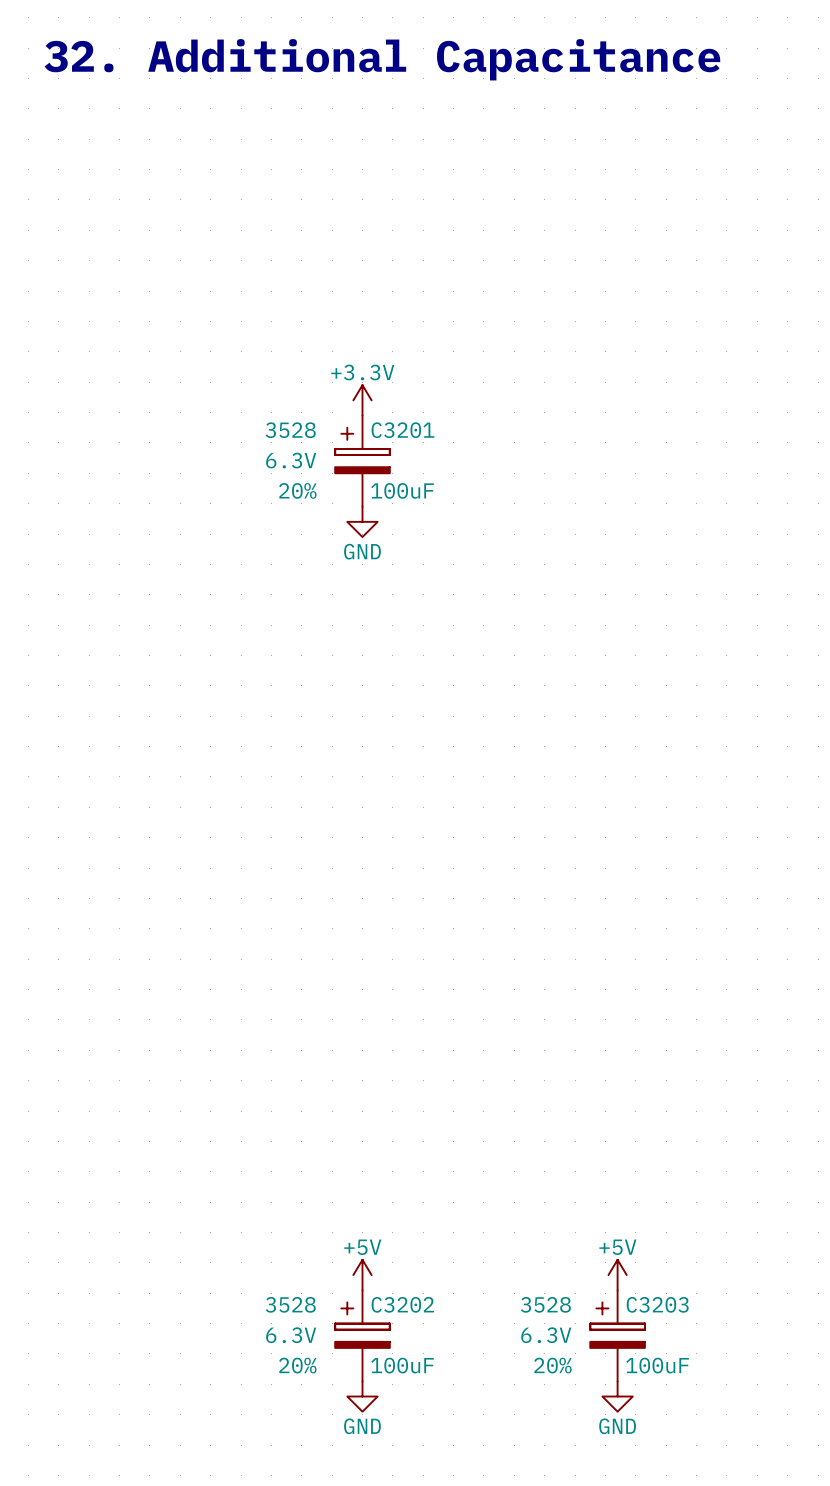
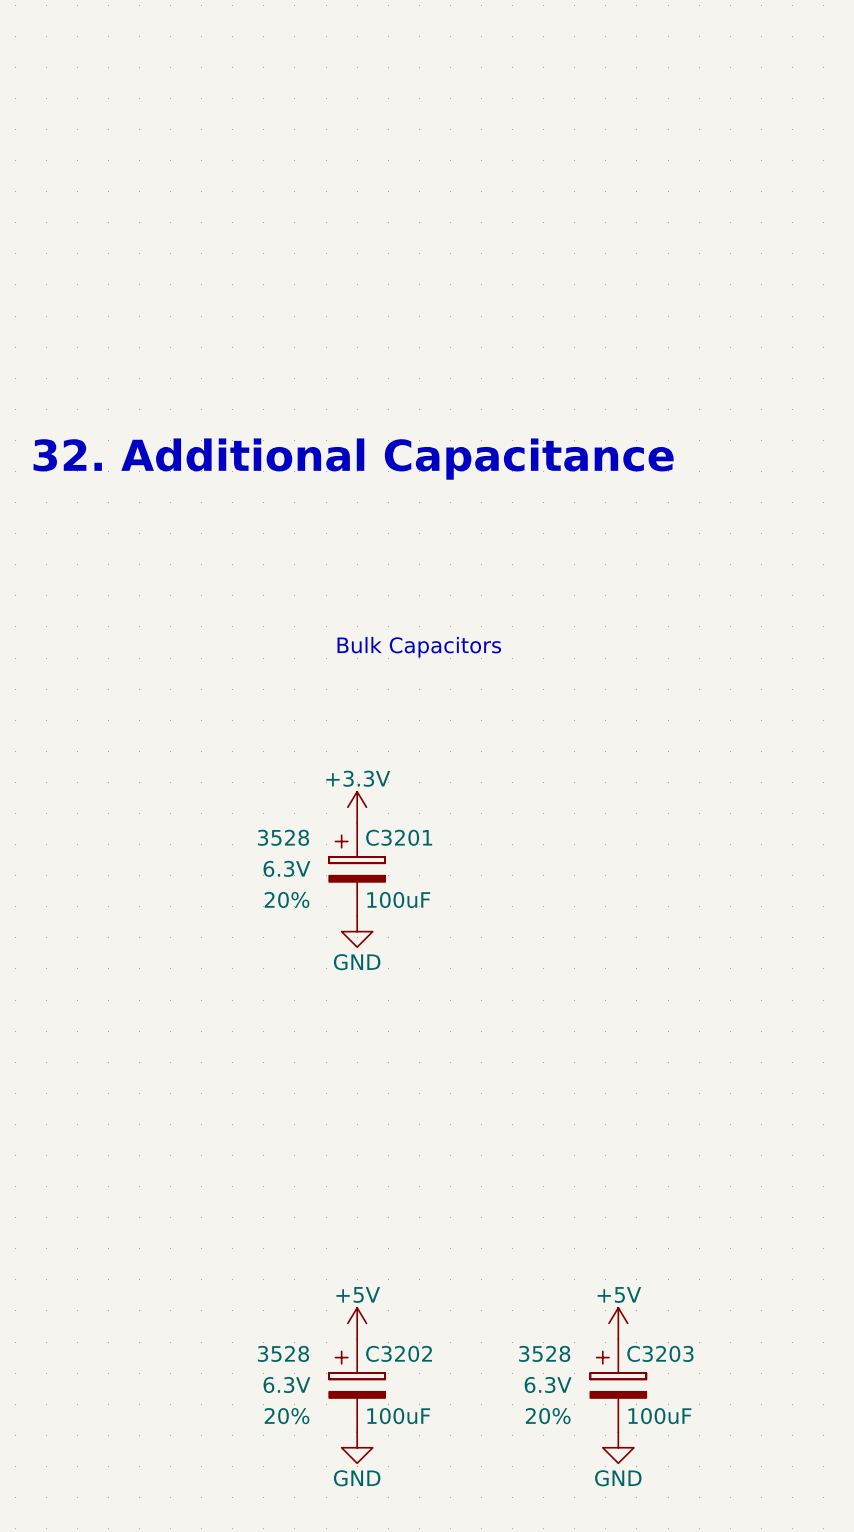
text: 32. Additional Capacitance (382, 59) -> none
power symbol: +3.3V (362, 400) -> none
text: none -> 32. Additional Capacitance (353, 459)
C3201 position: (362, 461) -> (357, 869)
power symbol: GND (362, 521) -> none
text: none -> Bulk Capacitors (419, 647)
power symbol: none -> +3.3V (357, 807)
power symbol: none -> GND (357, 931)

